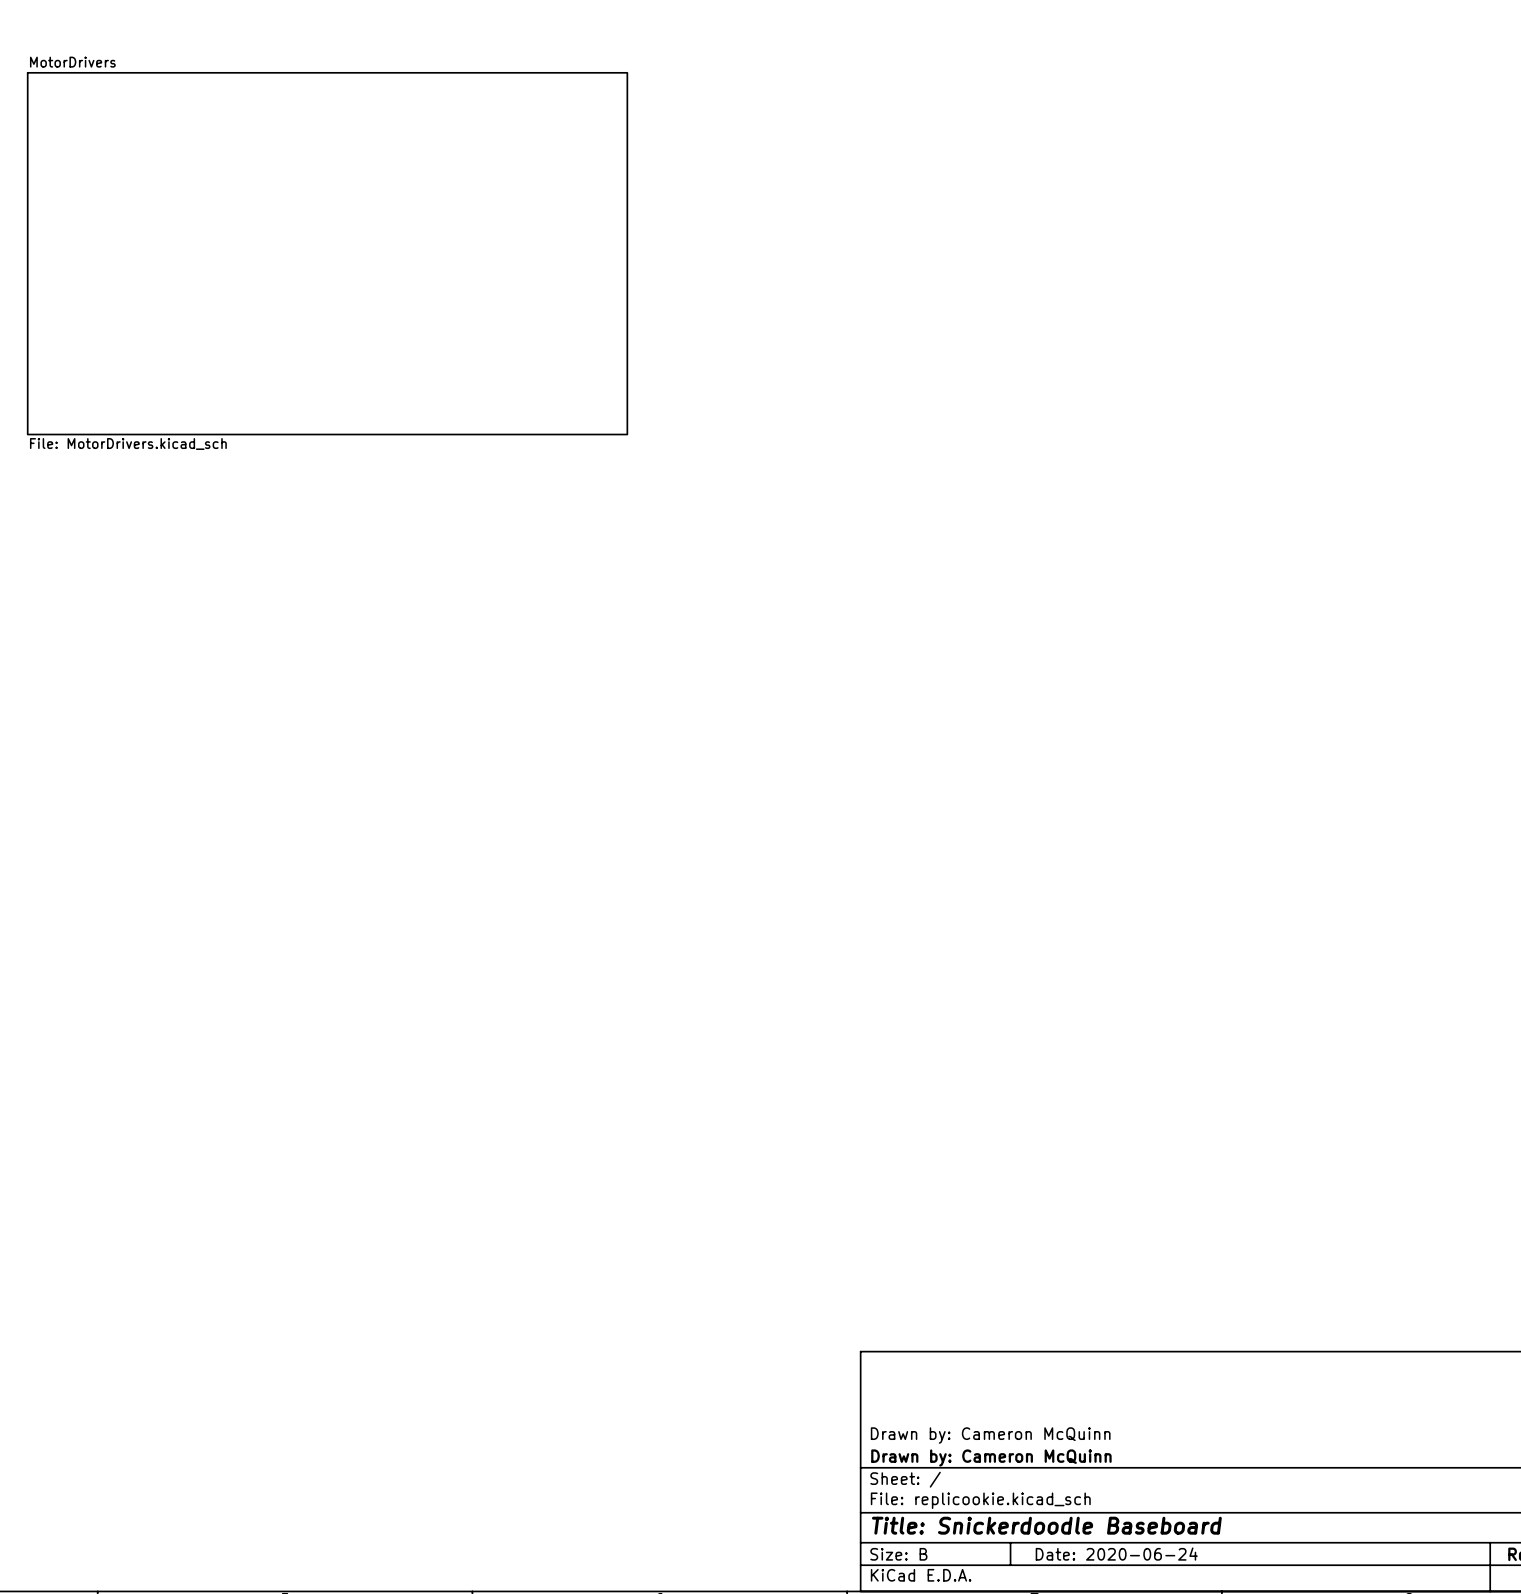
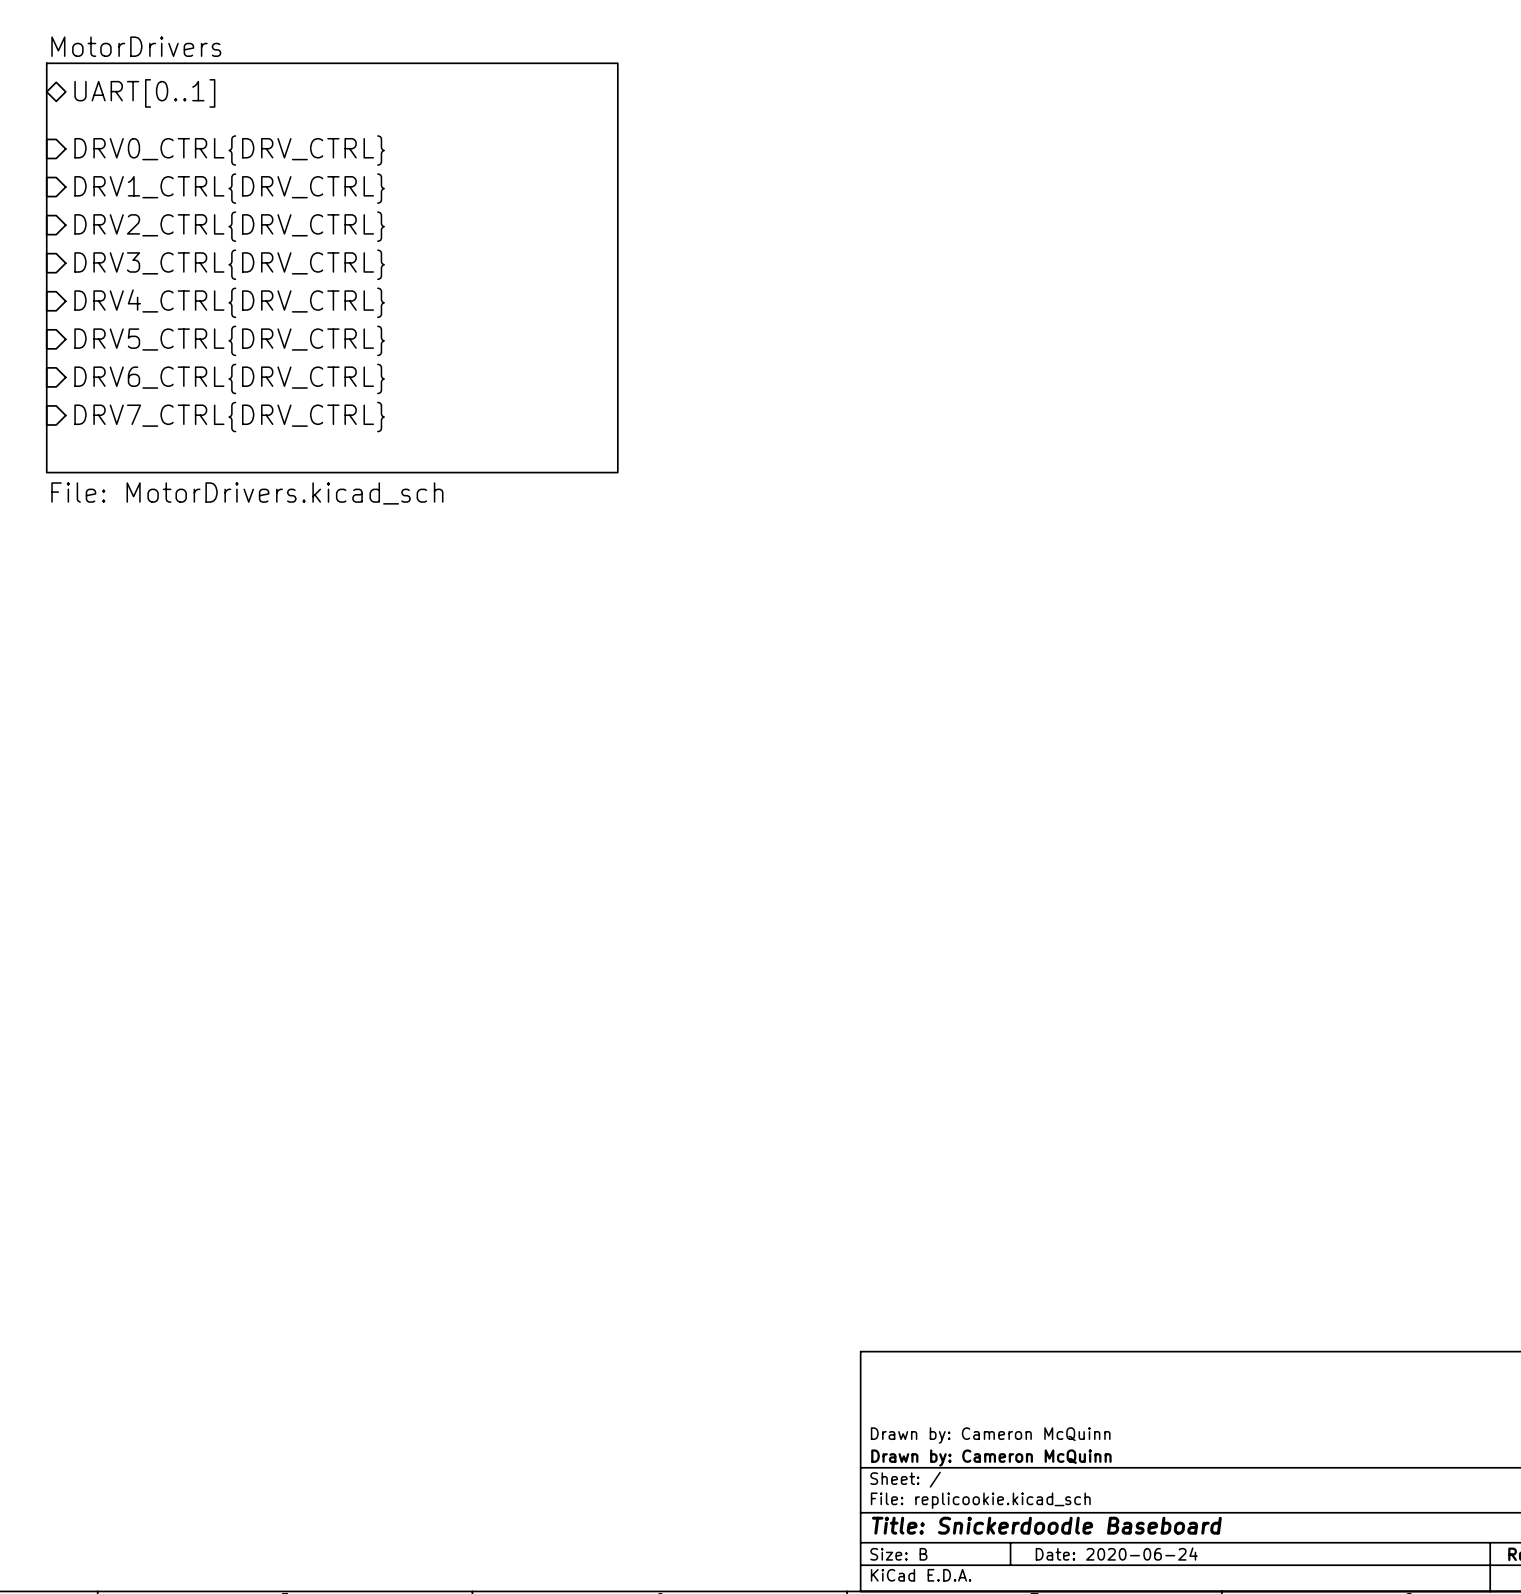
sheet pin: none -> UART[0..1] (144, 93)
sheet pin: none -> DRV0_CTRL{DRV_CTRL} (229, 150)
sheet pin: none -> DRV1_CTRL{DRV_CTRL} (229, 188)
sheet pin: none -> DRV2_CTRL{DRV_CTRL} (229, 226)
sheet MotorDrivers: File: MotorDrivers.kicad_sch (327, 253) -> none
sheet pin: none -> DRV3_CTRL{DRV_CTRL} (229, 264)
sheet MotorDrivers: none -> File: MotorDrivers.kicad_sch (332, 267)
sheet pin: none -> DRV4_CTRL{DRV_CTRL} (229, 302)
sheet pin: none -> DRV5_CTRL{DRV_CTRL} (229, 340)
sheet pin: none -> DRV6_CTRL{DRV_CTRL} (229, 378)
sheet pin: none -> DRV7_CTRL{DRV_CTRL} (229, 417)

